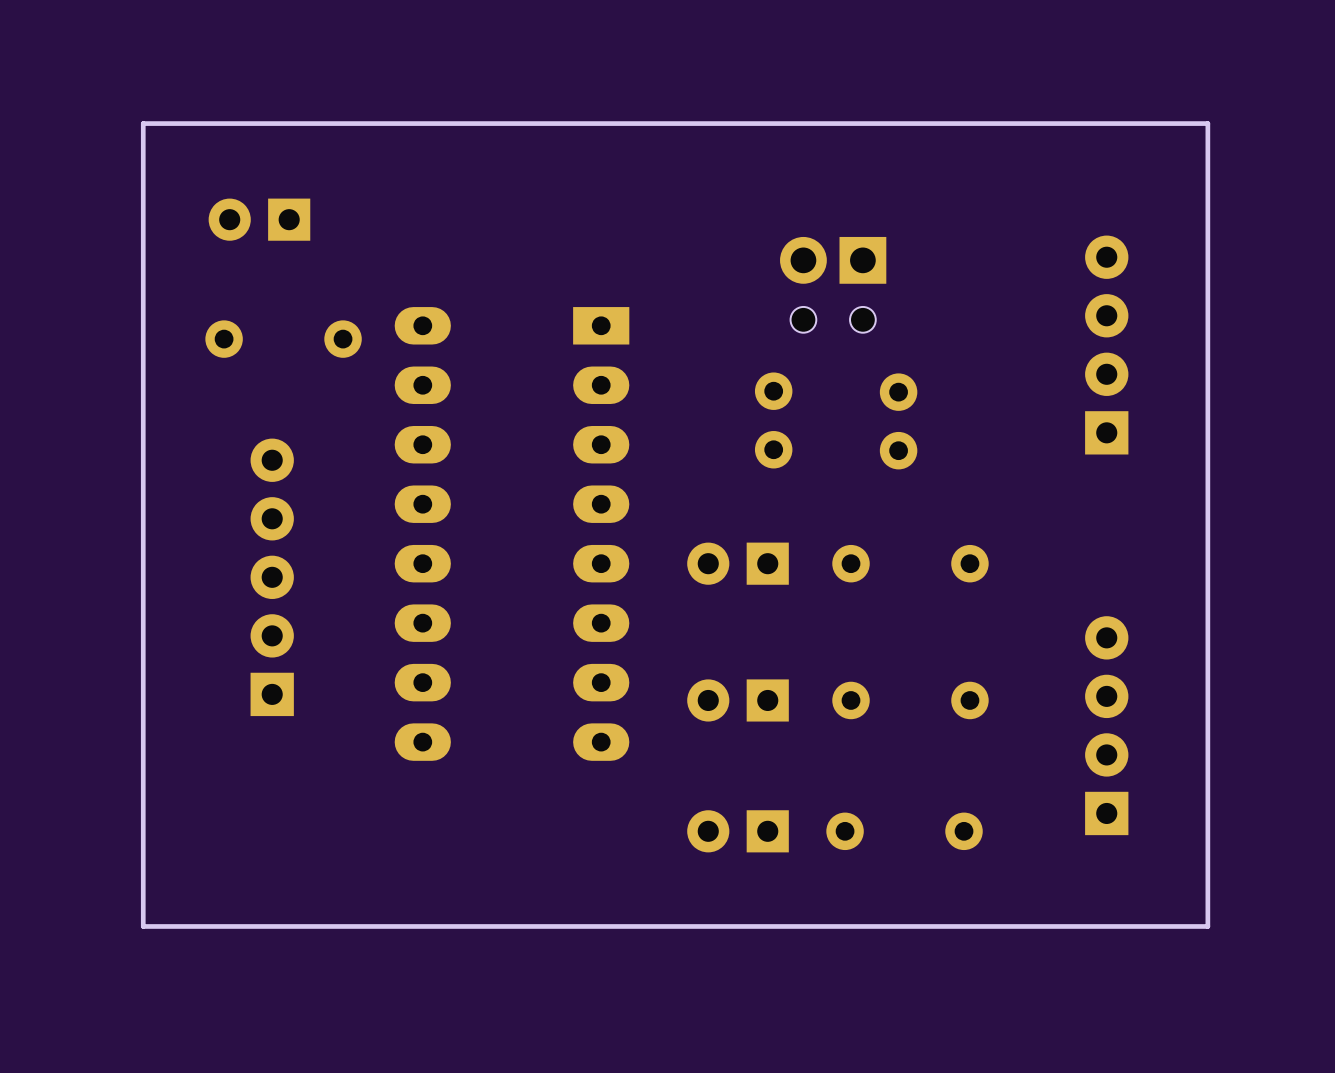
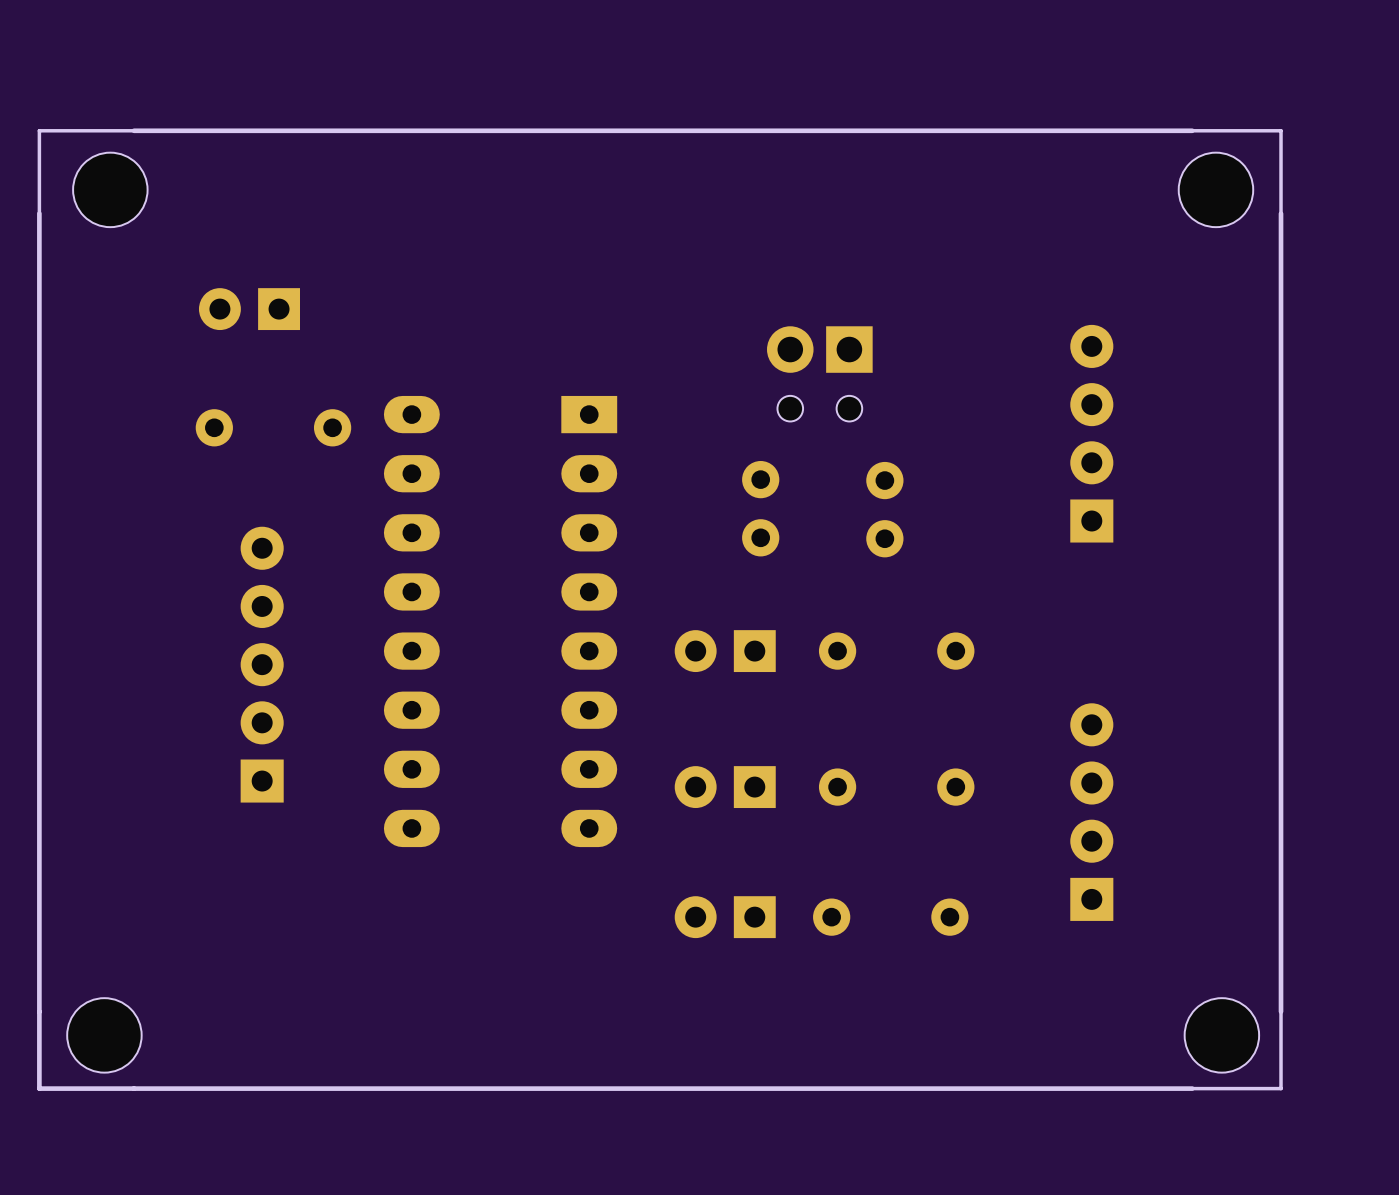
part: none -> (110, 189)
part: none -> (1215, 189)
board edge: (1207, 123) (1207, 926) (143, 926) (143, 123) (1207, 123) -> (1281, 130) (1281, 1088) (39, 1088) (39, 130) (1281, 130)
part: none -> (104, 1035)
part: none -> (1221, 1035)

